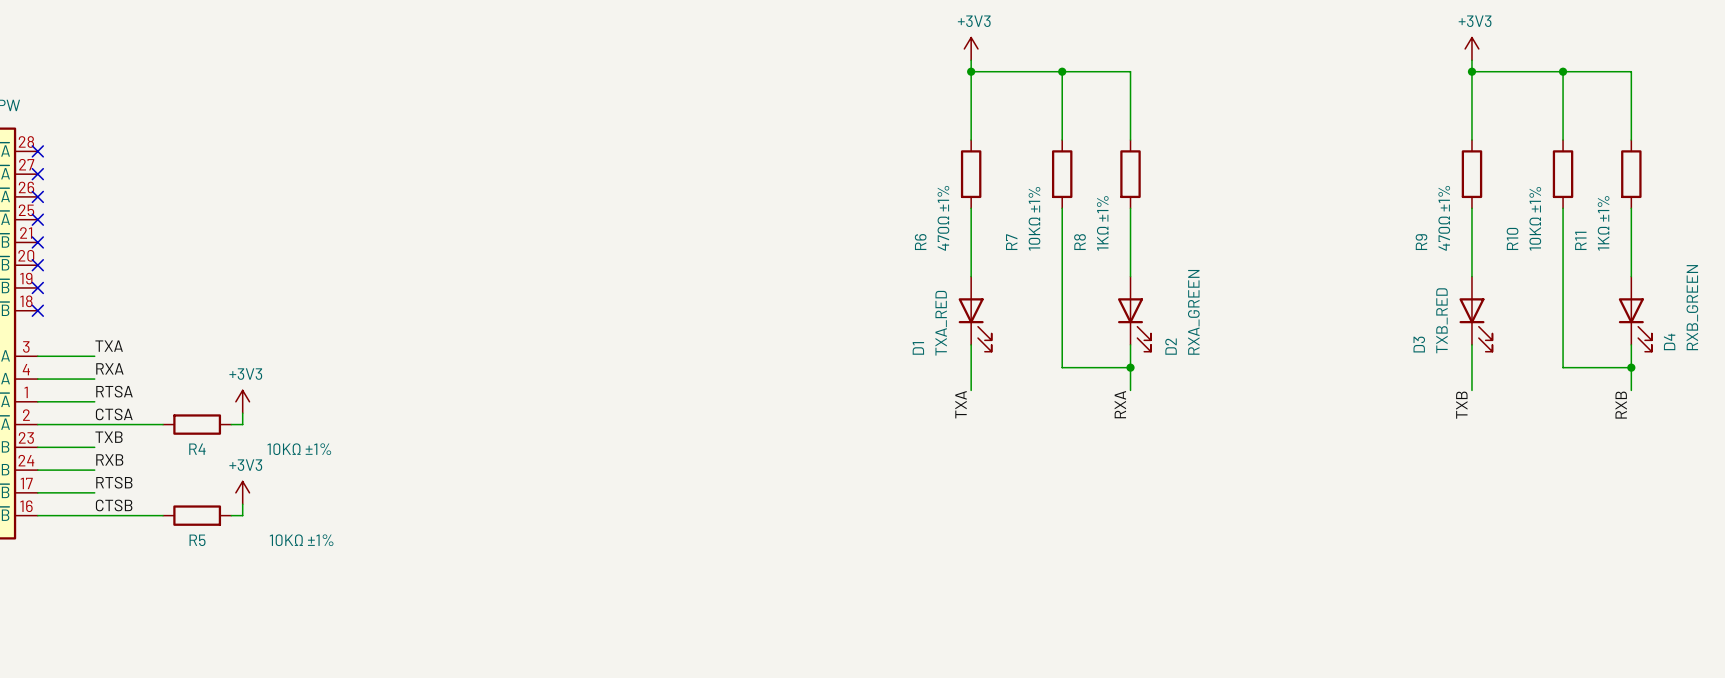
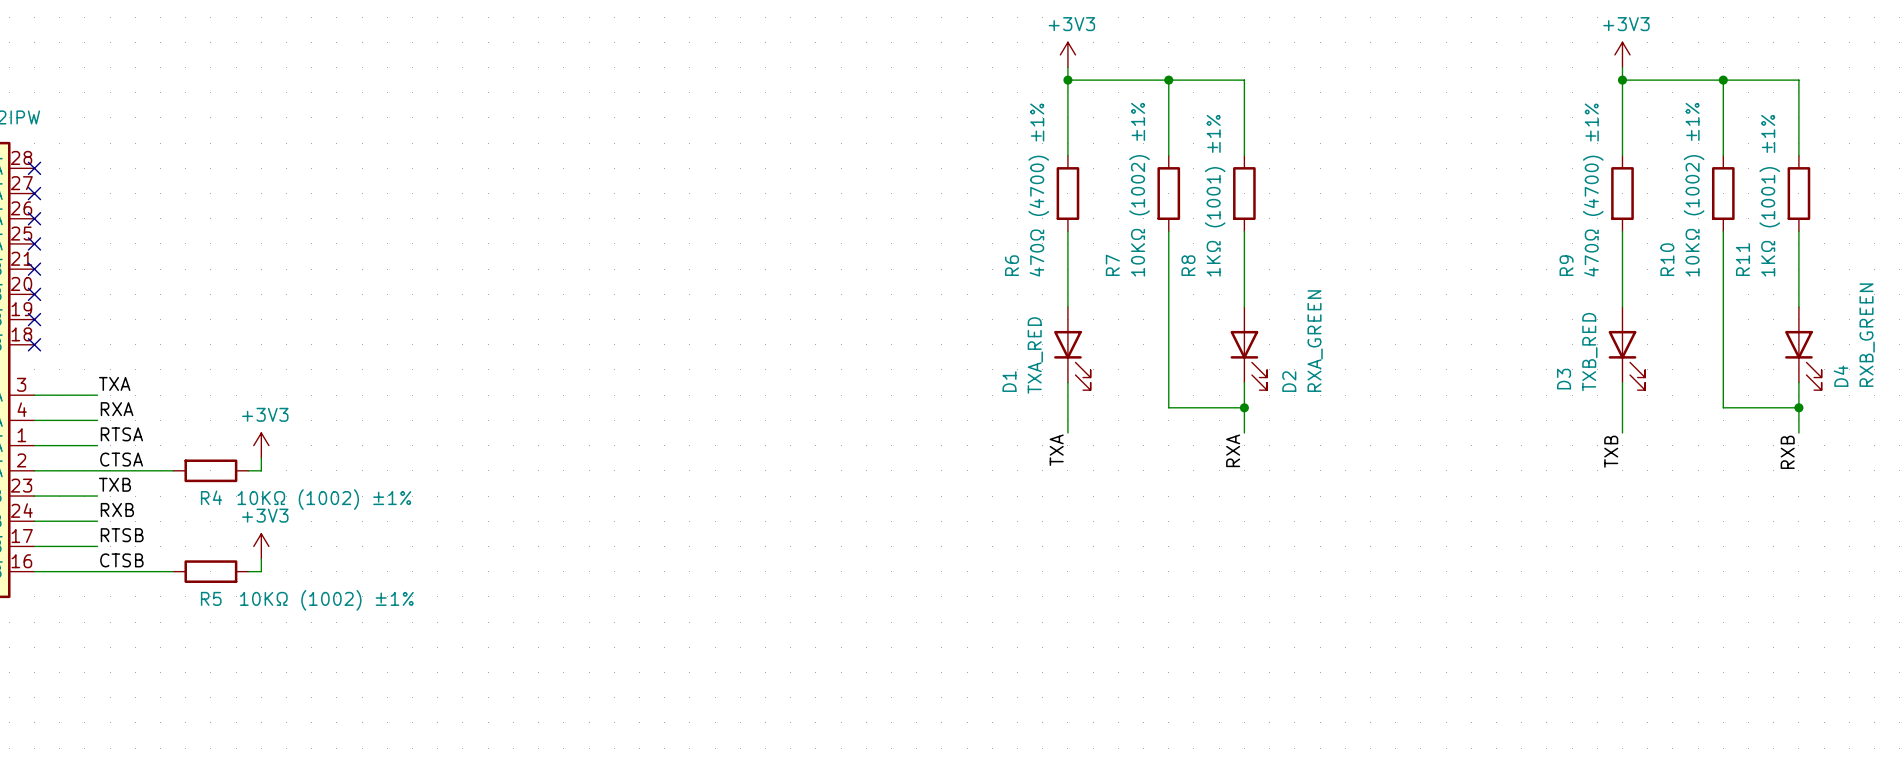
R6 value: 470Ω ±1% (943, 218) -> 470Ω (4700) ±1% (1038, 190)
R7 value: 10KΩ ±1% (1034, 218) -> 10KΩ (1002) ±1% (1139, 189)
R9 value: 470Ω ±1% (1444, 218) -> 470Ω (4700) ±1% (1593, 190)
R10 value: 10KΩ ±1% (1535, 218) -> 10KΩ (1002) ±1% (1694, 189)
R8 value: 1KΩ ±1% (1102, 223) -> 1KΩ (1001) ±1% (1215, 195)
R11 value: 1KΩ ±1% (1603, 223) -> 1KΩ (1001) ±1% (1769, 195)
R4 value: 10KΩ ±1% (299, 449) -> 10KΩ (1002) ±1% (324, 499)
R5 value: 10KΩ ±1% (301, 540) -> 10KΩ (1002) ±1% (326, 600)

